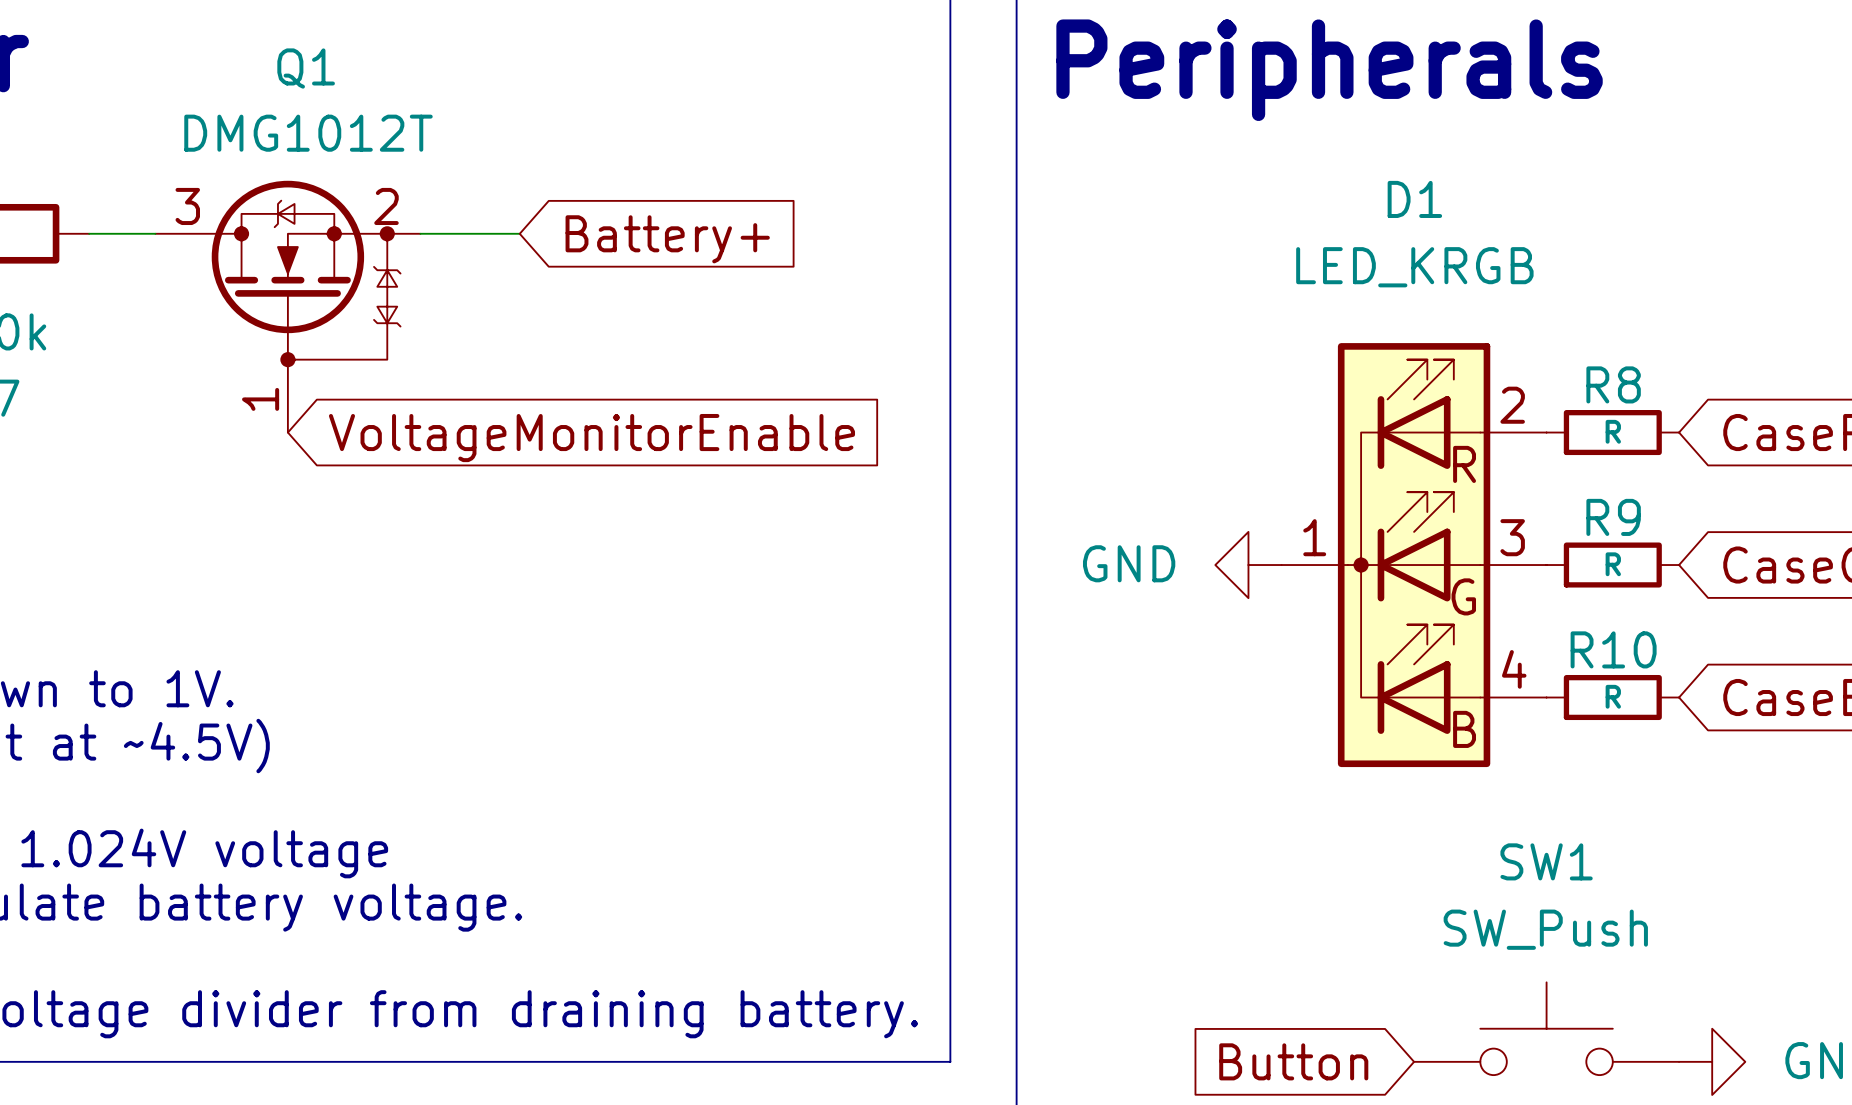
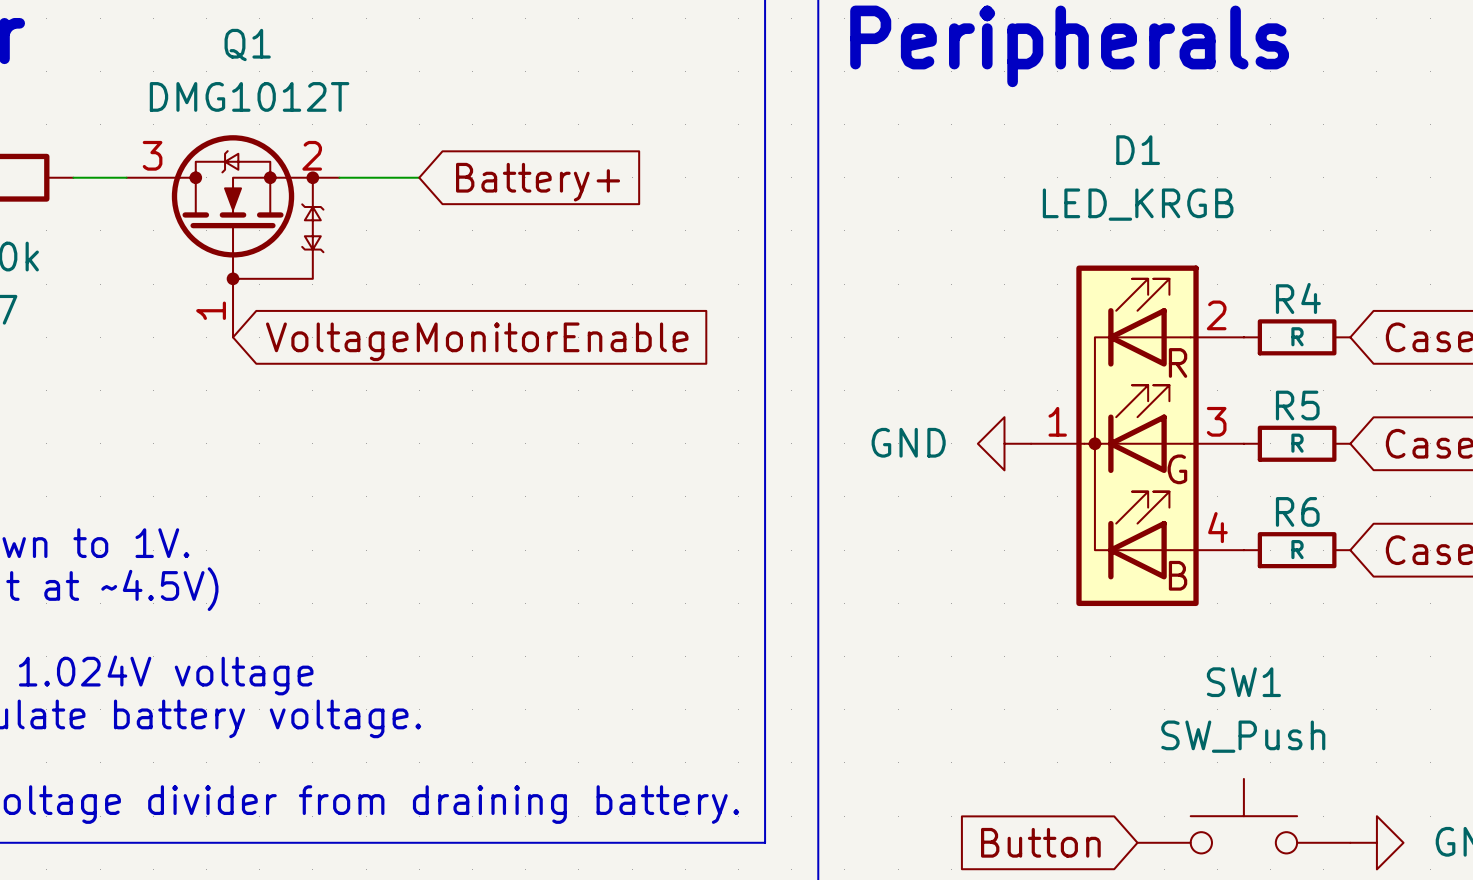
R8 name: R8 (1613, 384) -> R4 (1298, 298)
R9 name: R9 (1613, 517) -> R5 (1297, 405)
R10 name: R10 (1613, 649) -> R6 (1297, 511)

